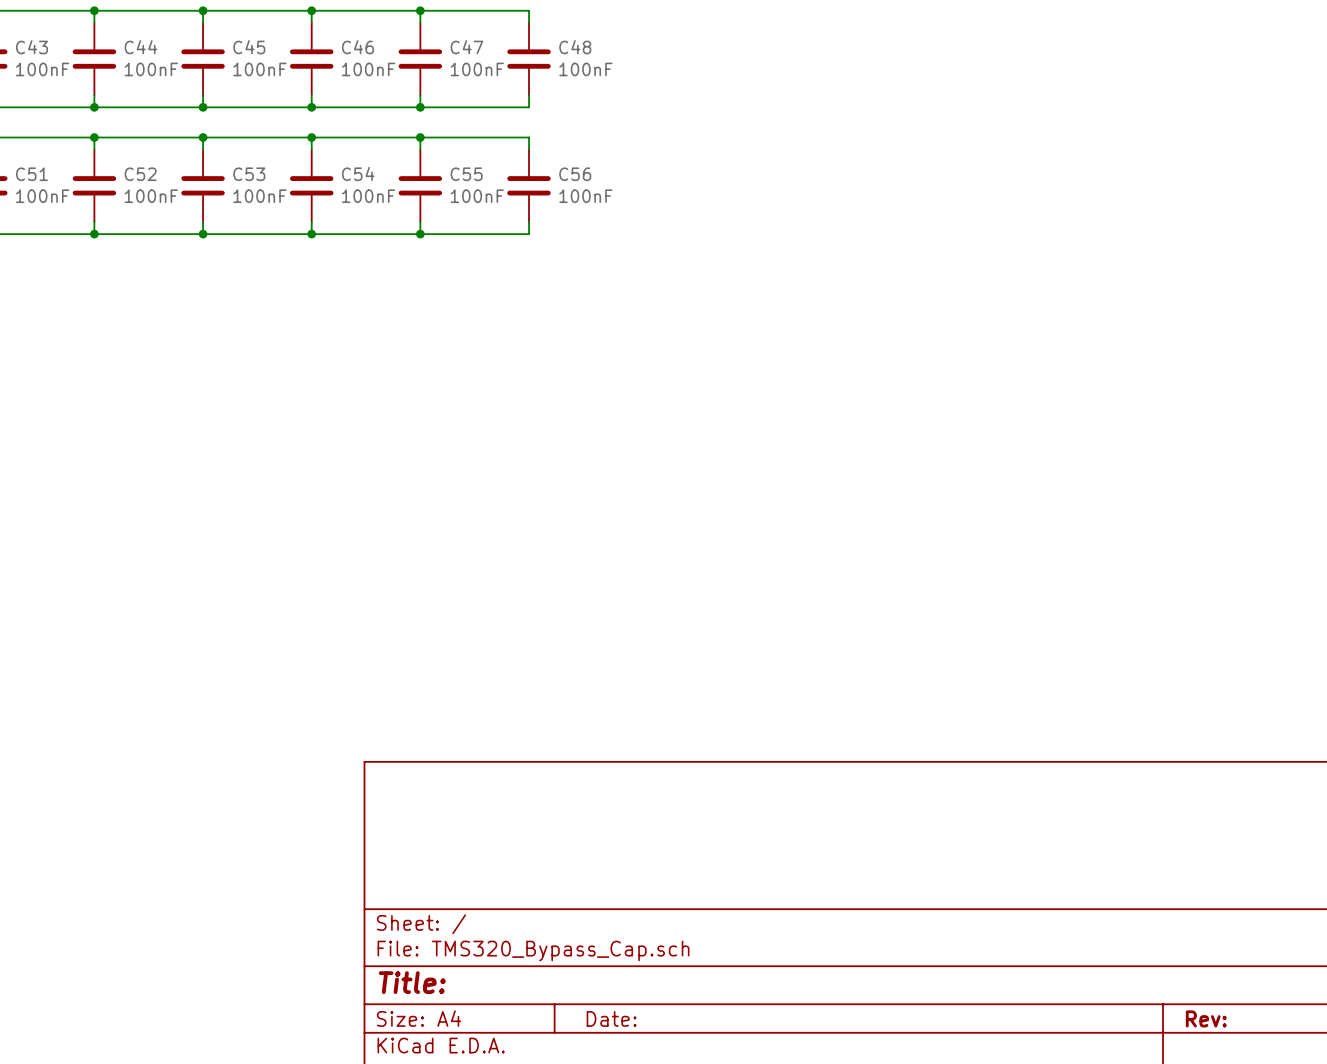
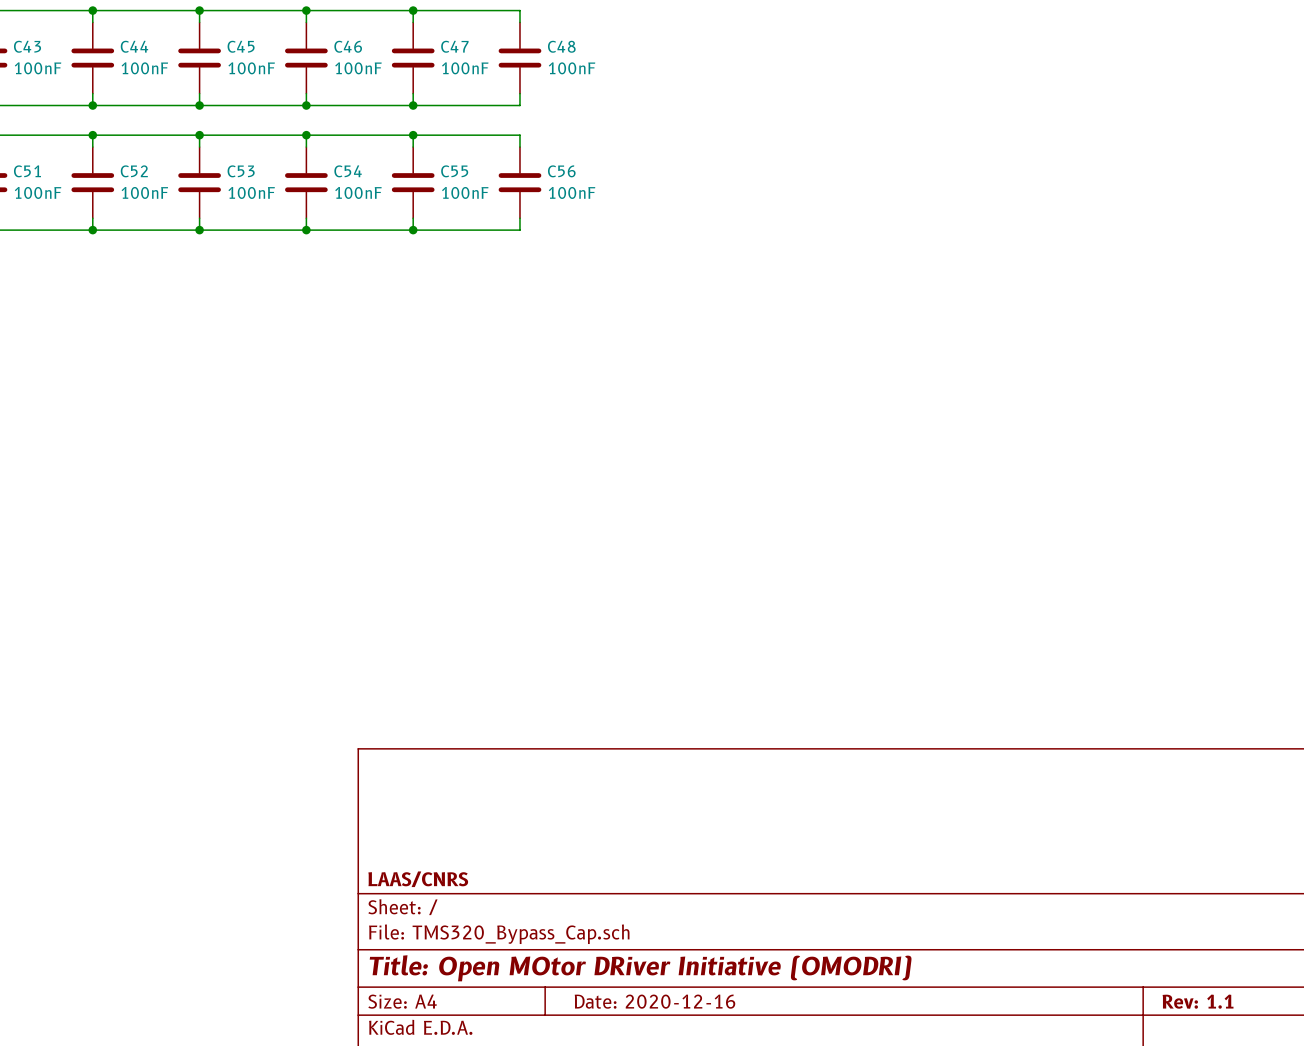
title block: none -> LAAS/CNRS (418, 879)
title block: Title: (412, 982) -> Title: Open MOtor DRiver Initiative (OMODRI) (640, 968)
title block: Date: (611, 1018) -> Date: 2020-12-16 (654, 1001)
title block: Rev: (1206, 1018) -> Rev: 1.1 (1198, 1001)

